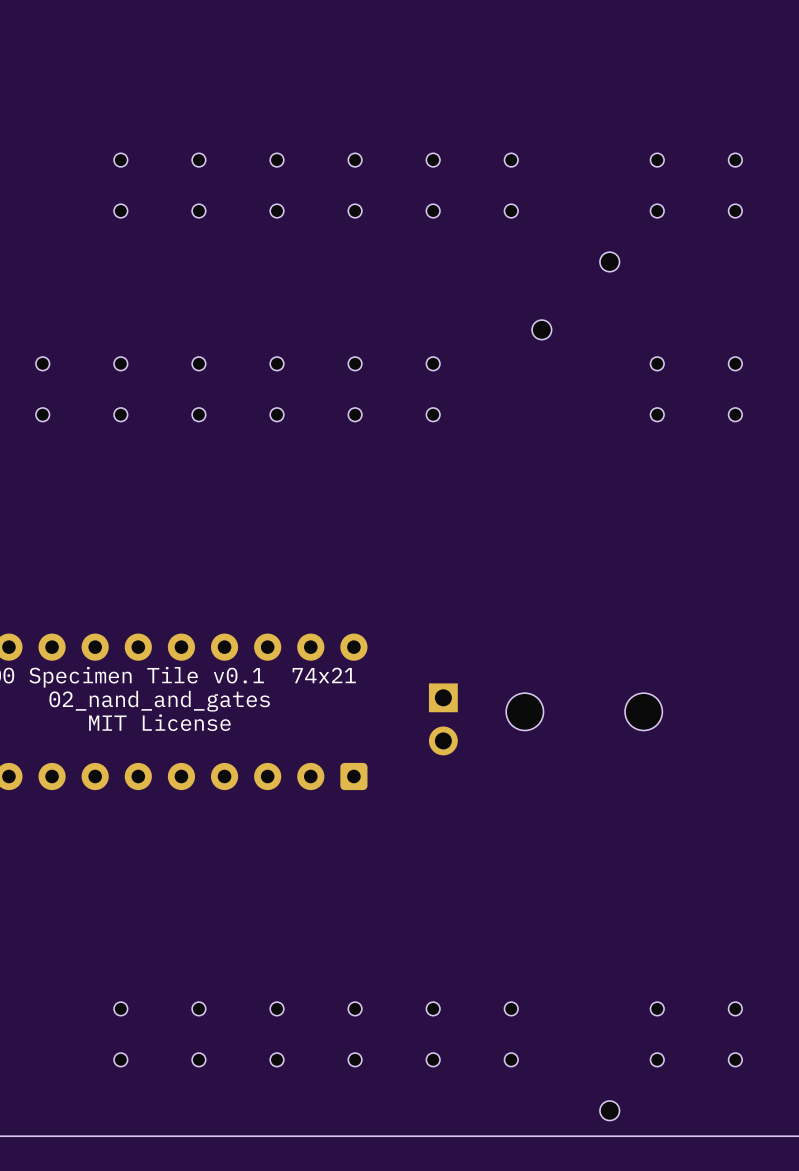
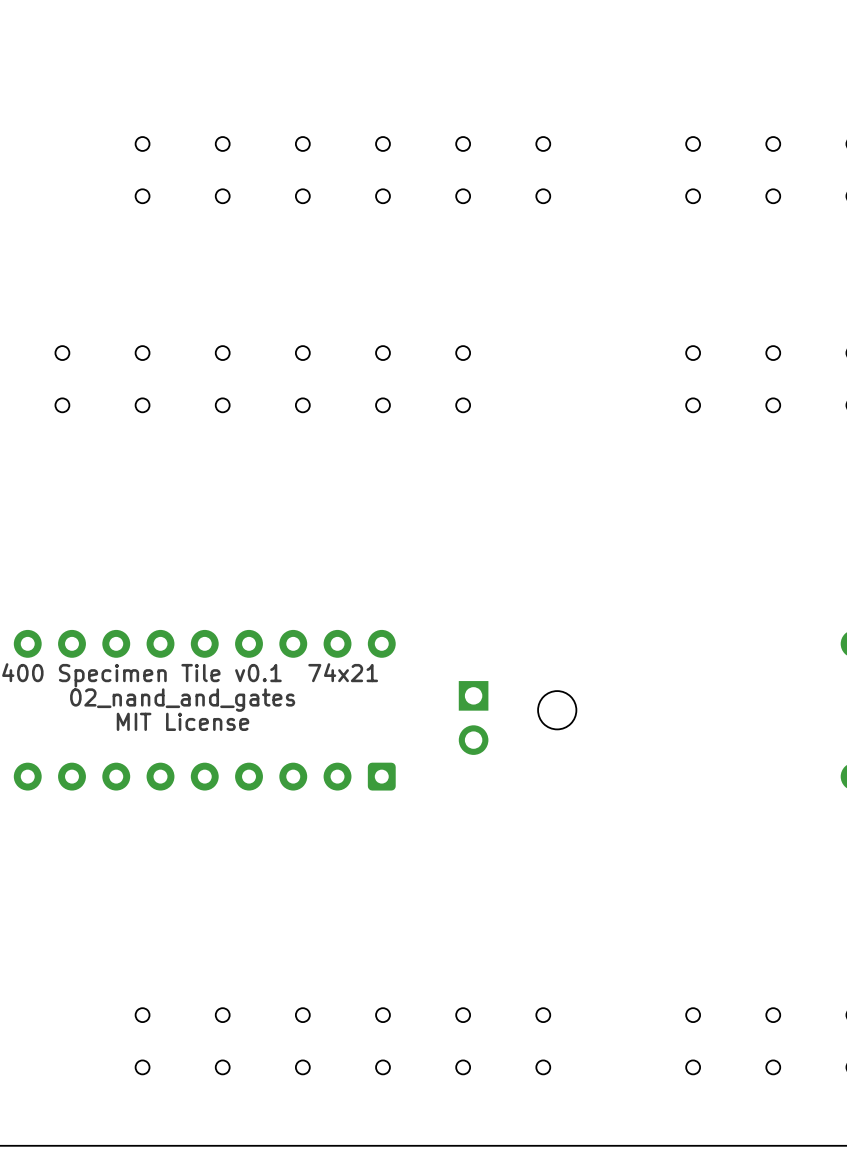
part: (609, 261) -> none
part: (541, 329) -> none
part: (643, 711) -> none
part: (609, 1110) -> none

